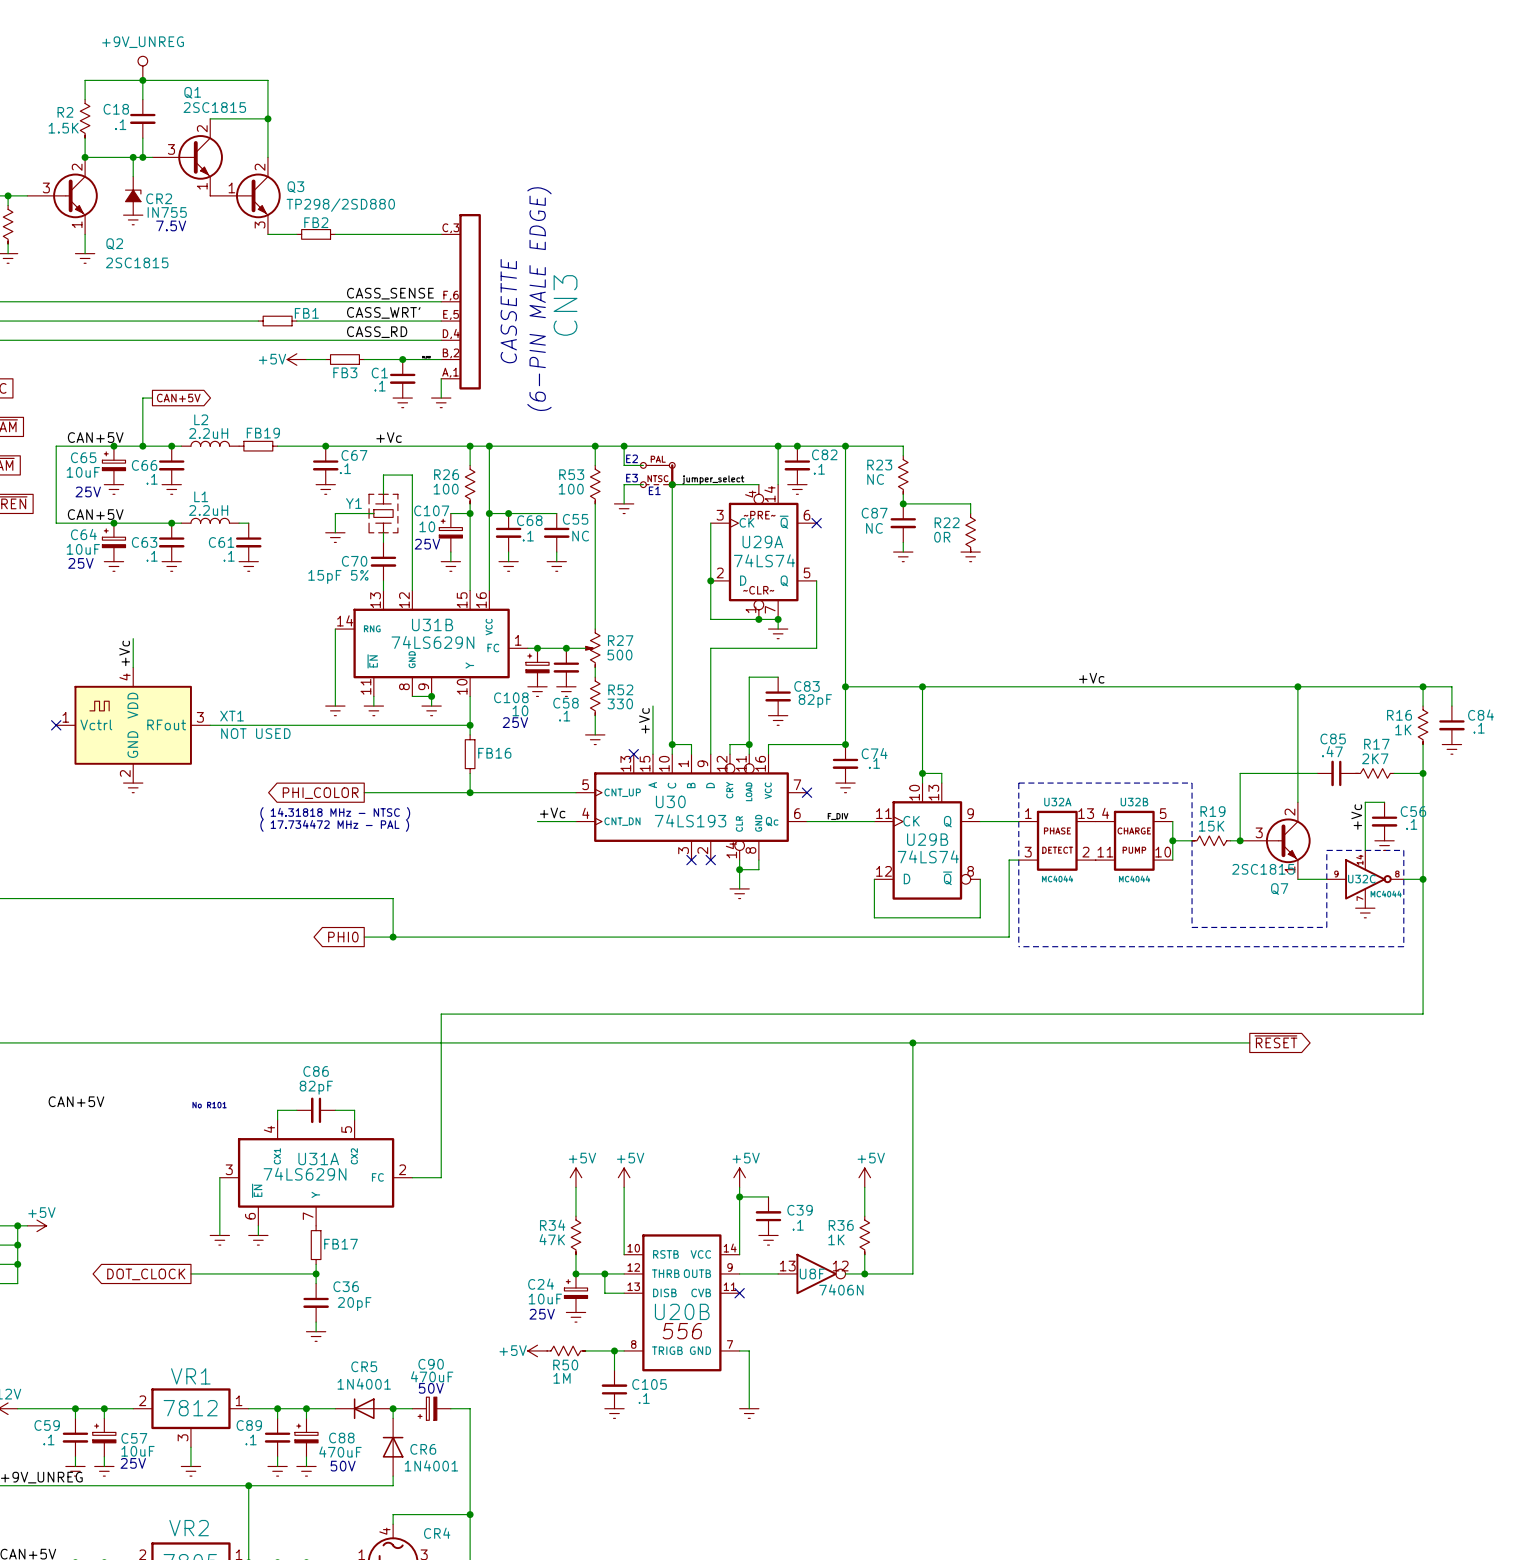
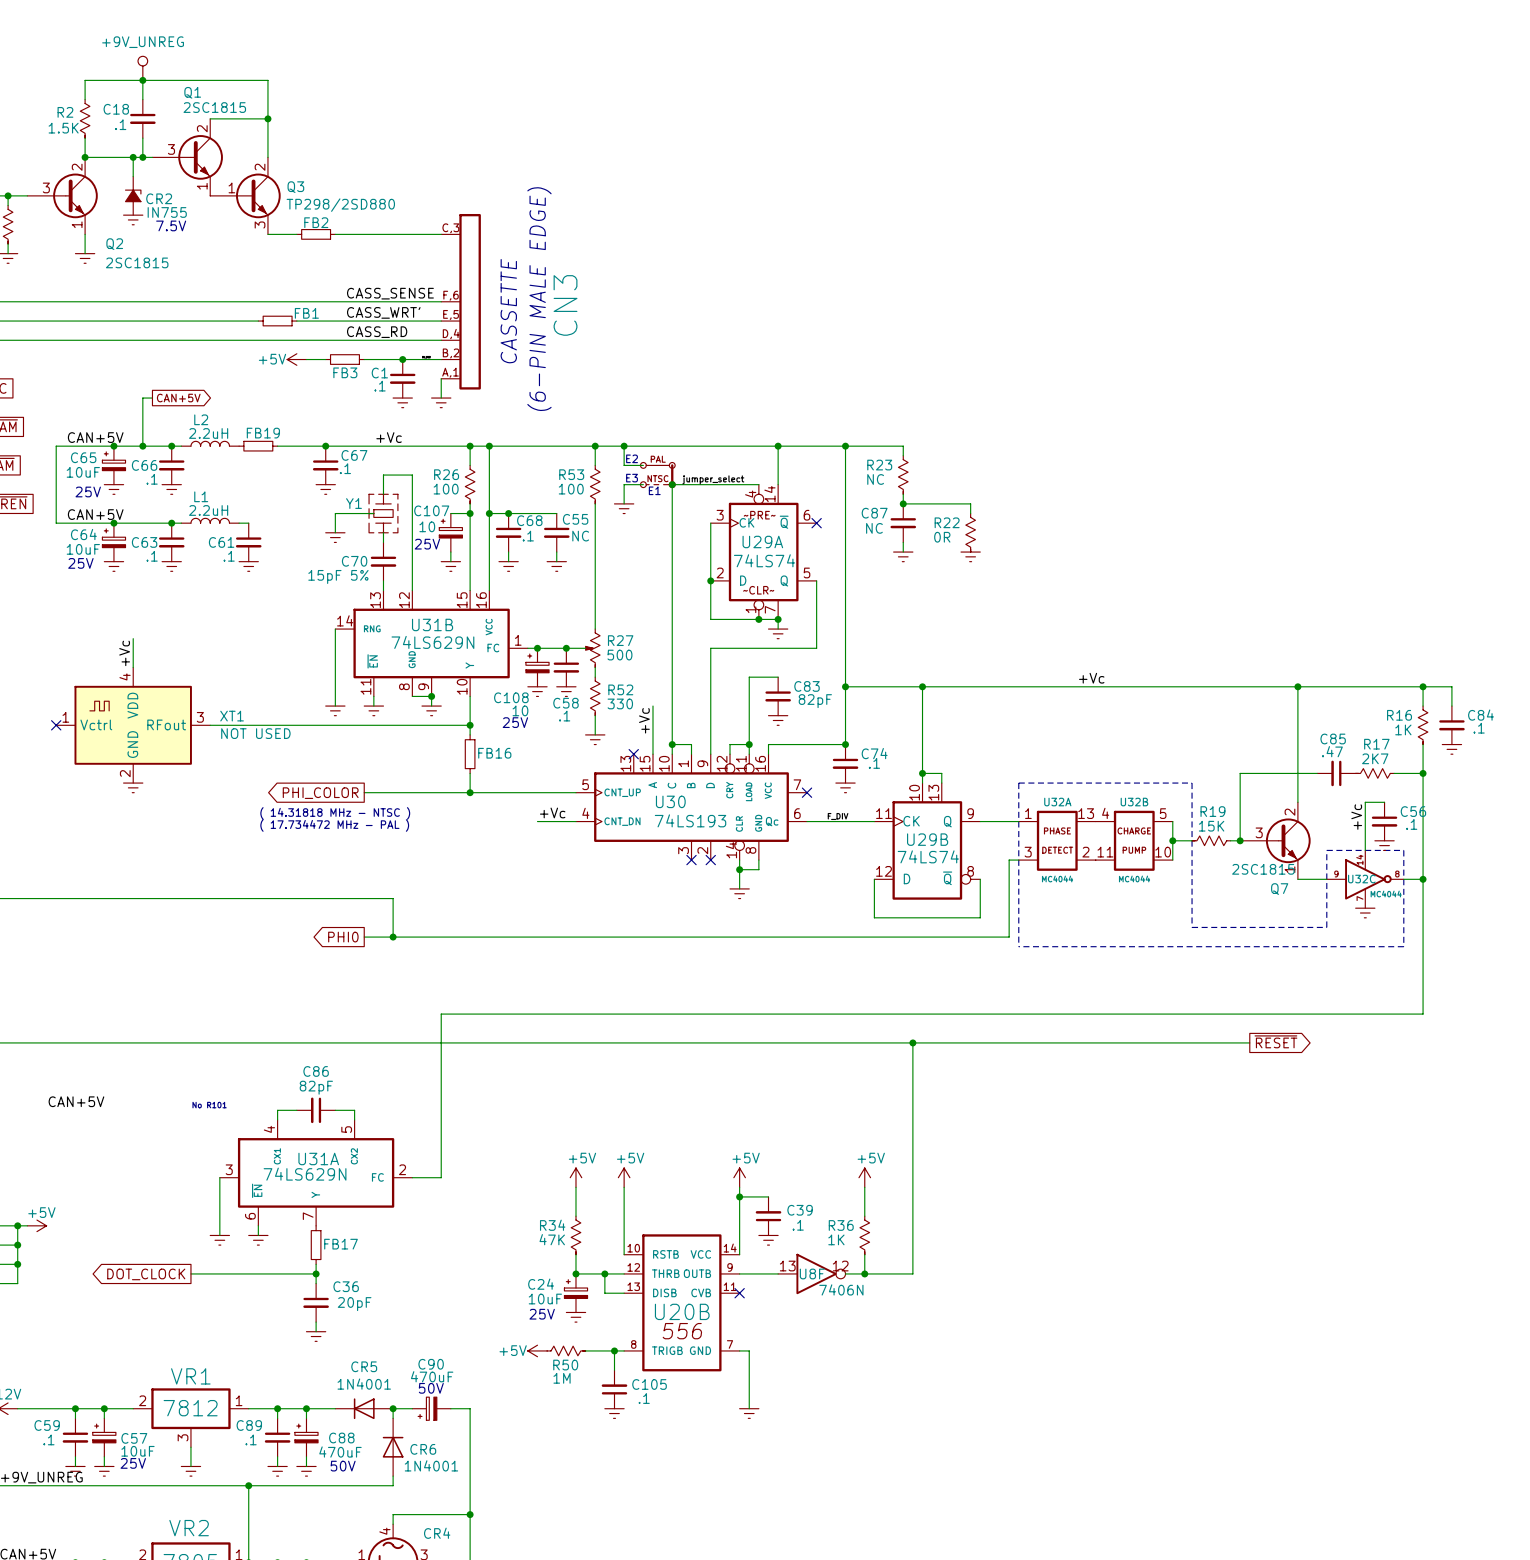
junction: (797, 446) -> none
C82: .1 (797, 465) -> none
power symbol: (797, 489) -> none

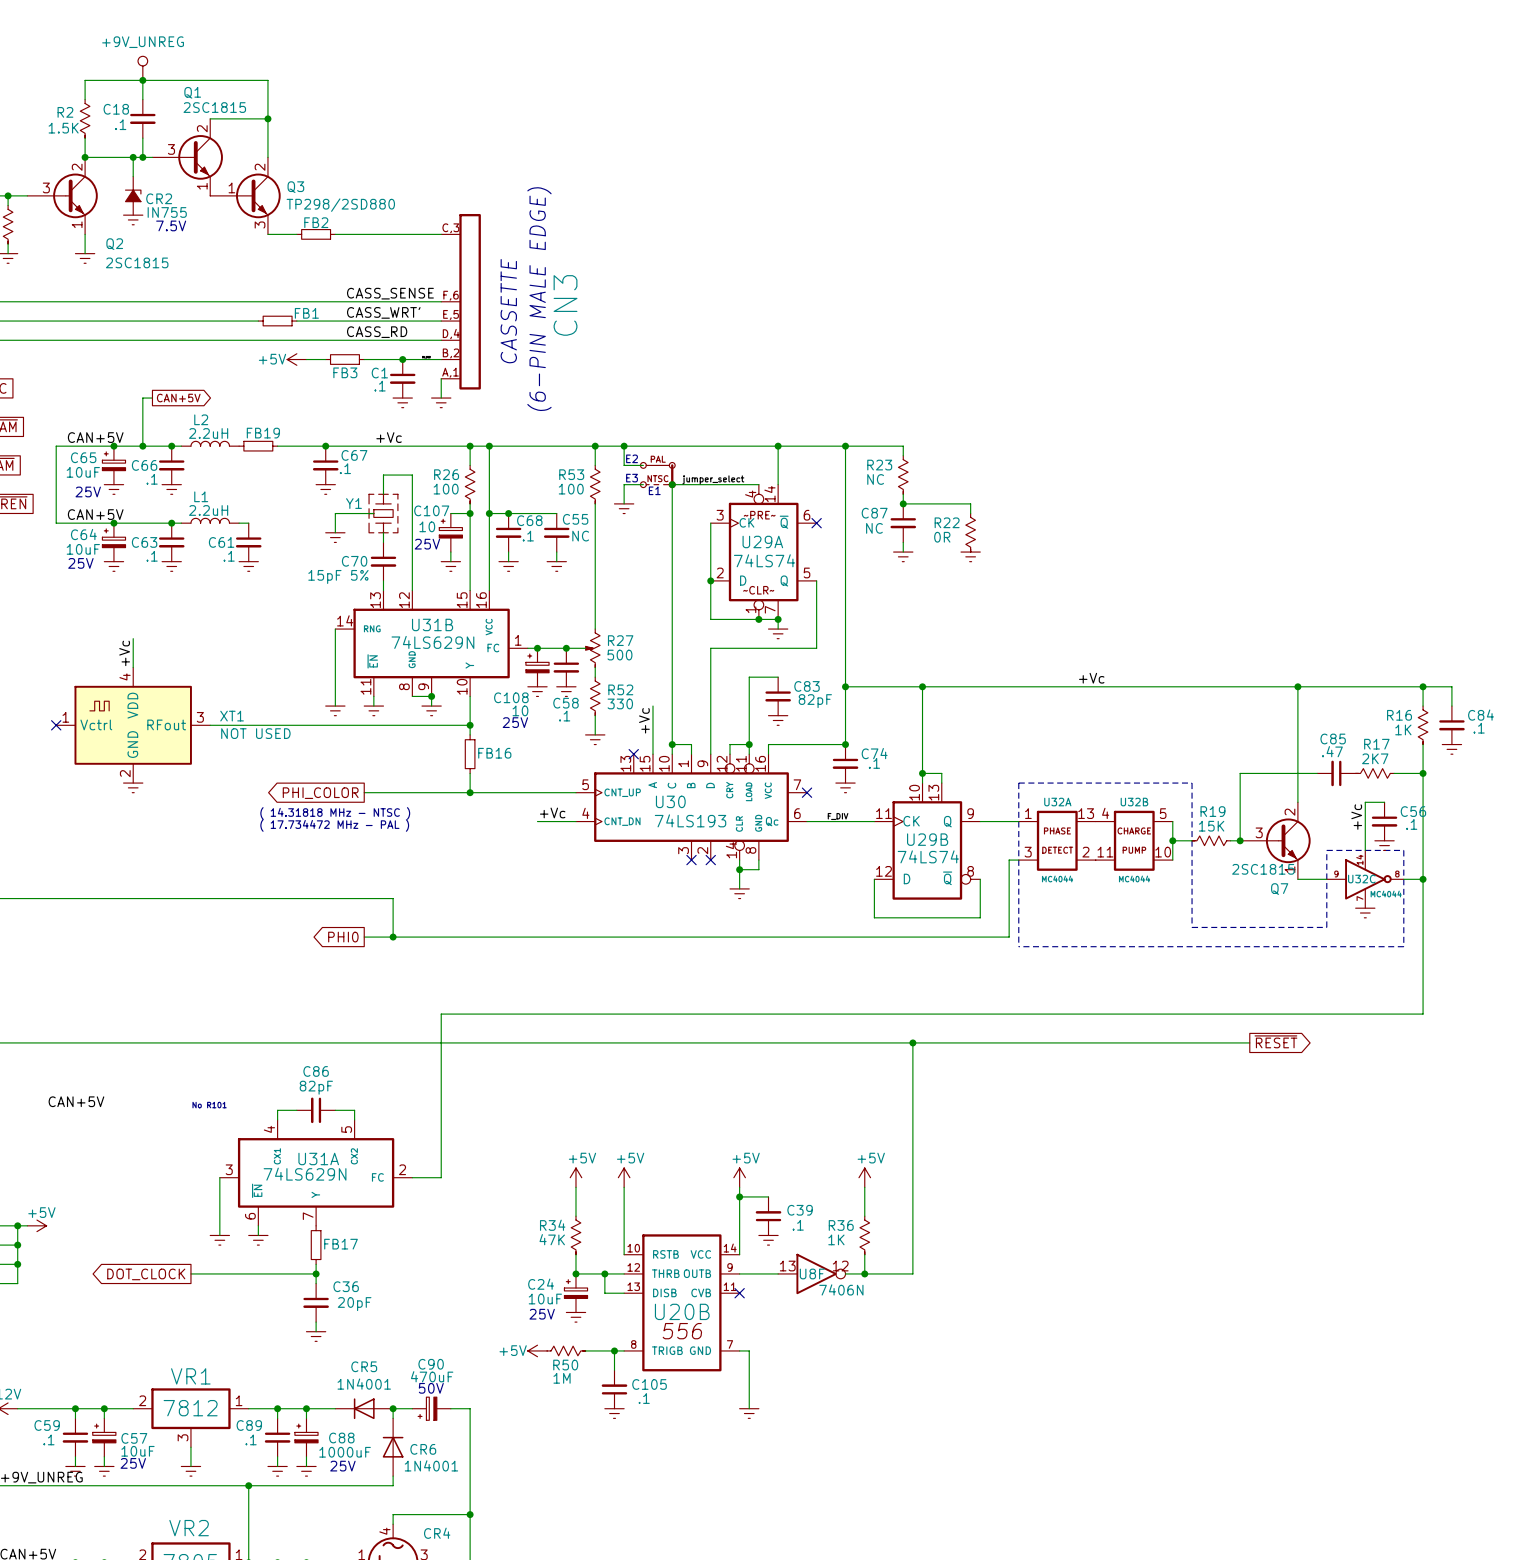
C88 value: 470uF (340, 1452) -> 1000uF (345, 1452)
text: 50V (343, 1466) -> 25V (342, 1466)

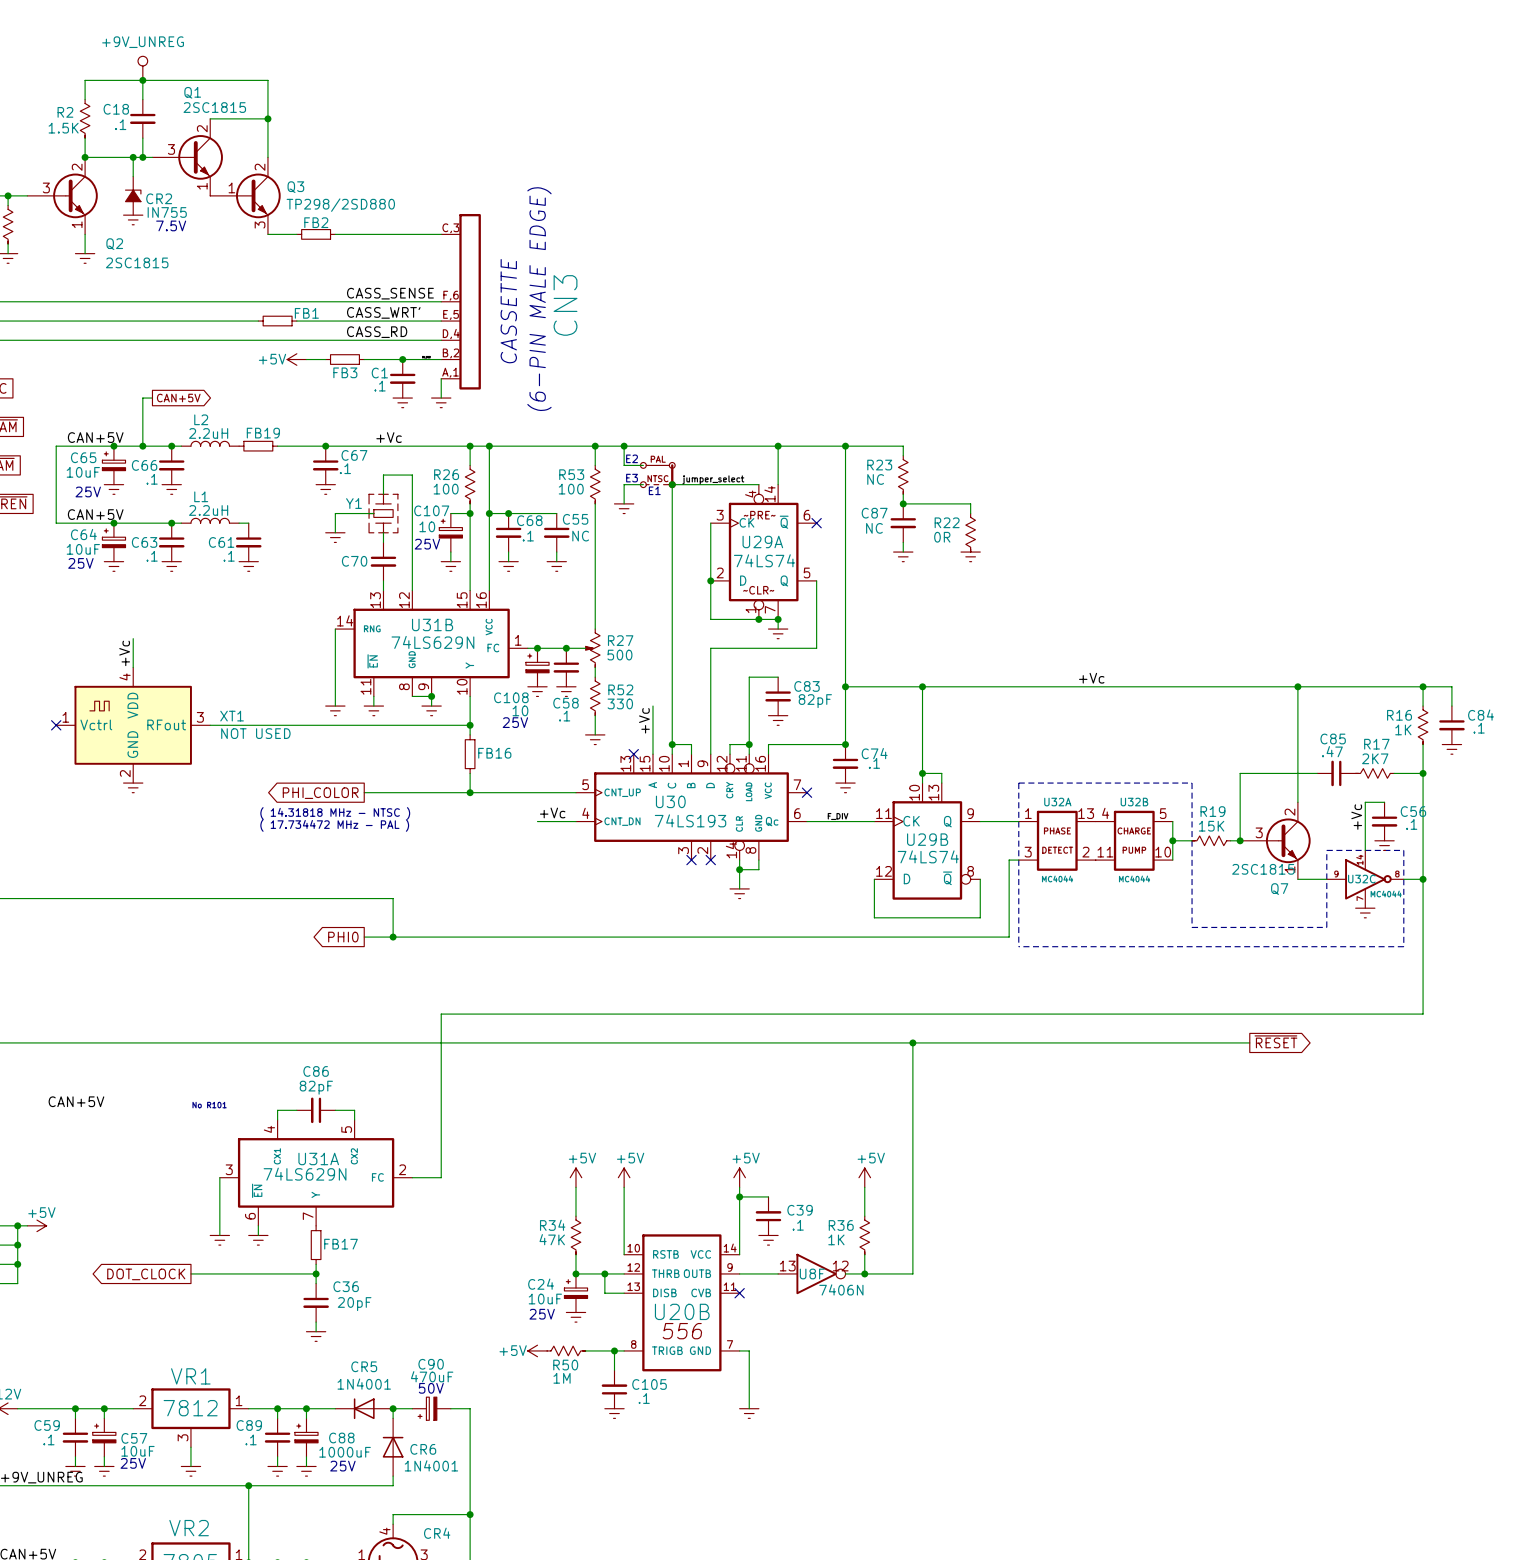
C70 value: 15pF 5% (338, 576) -> none

